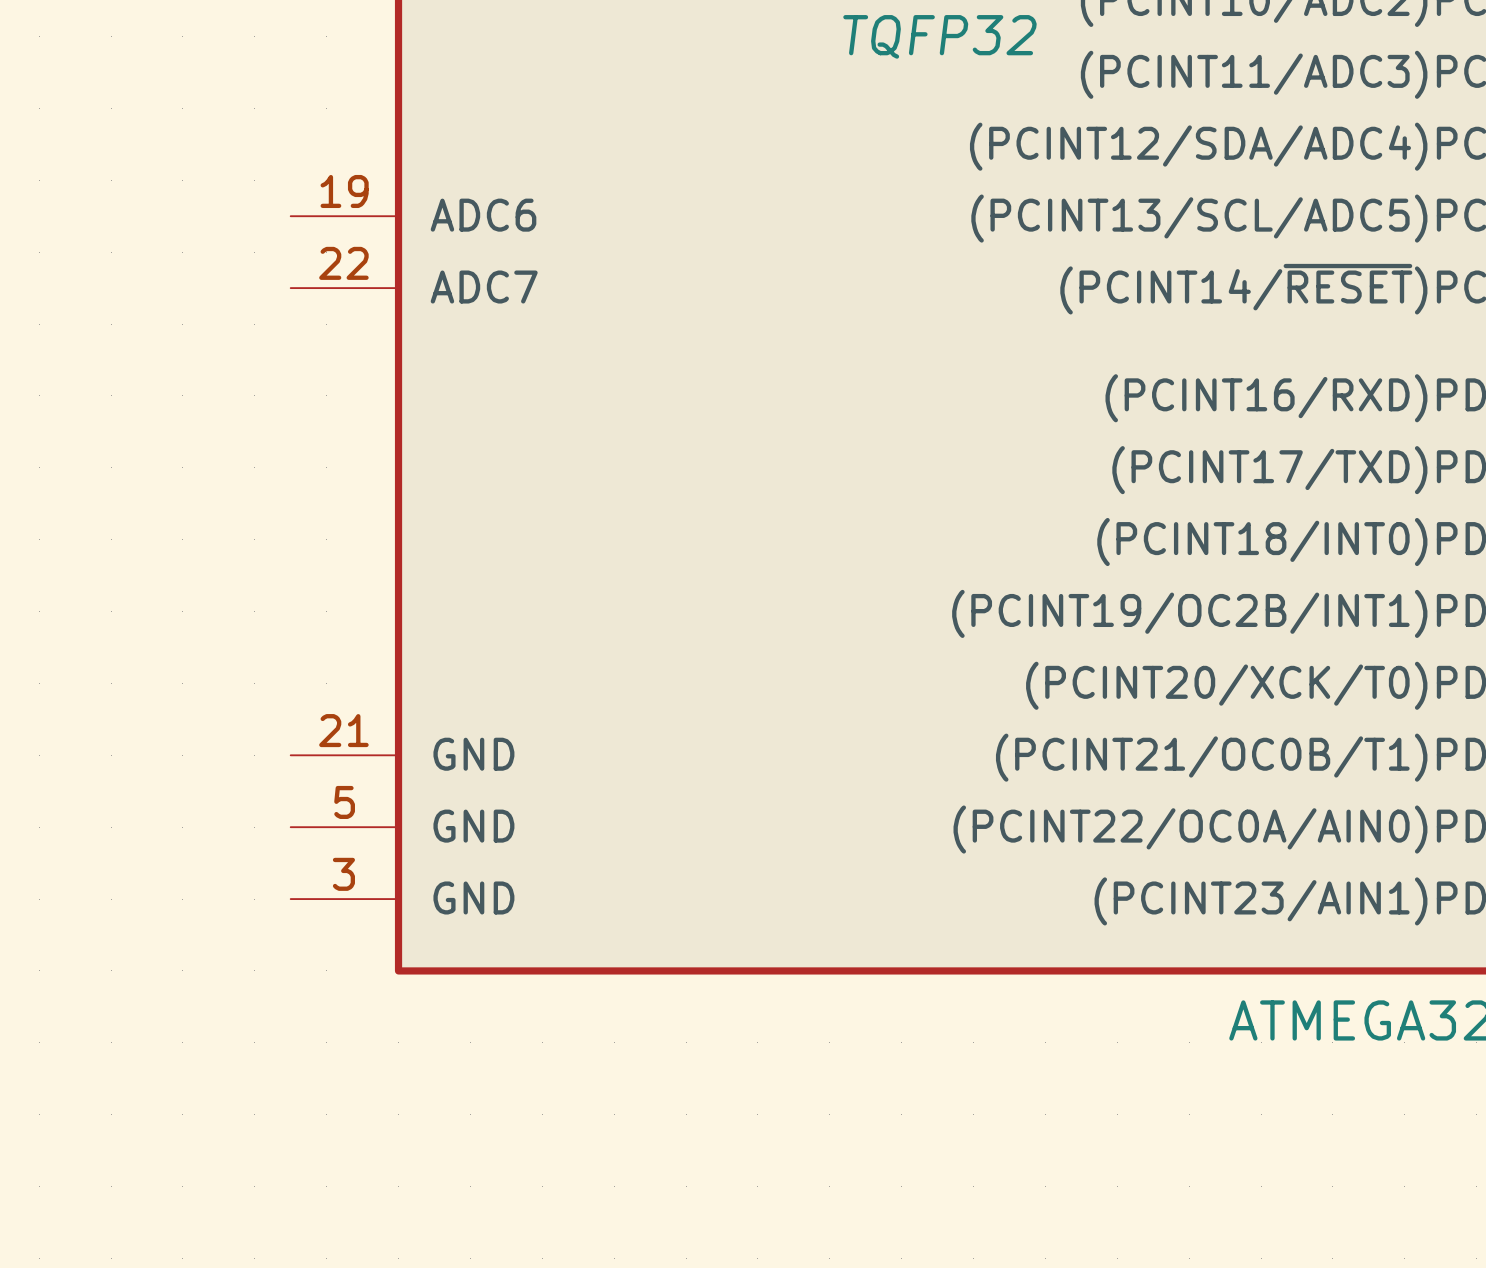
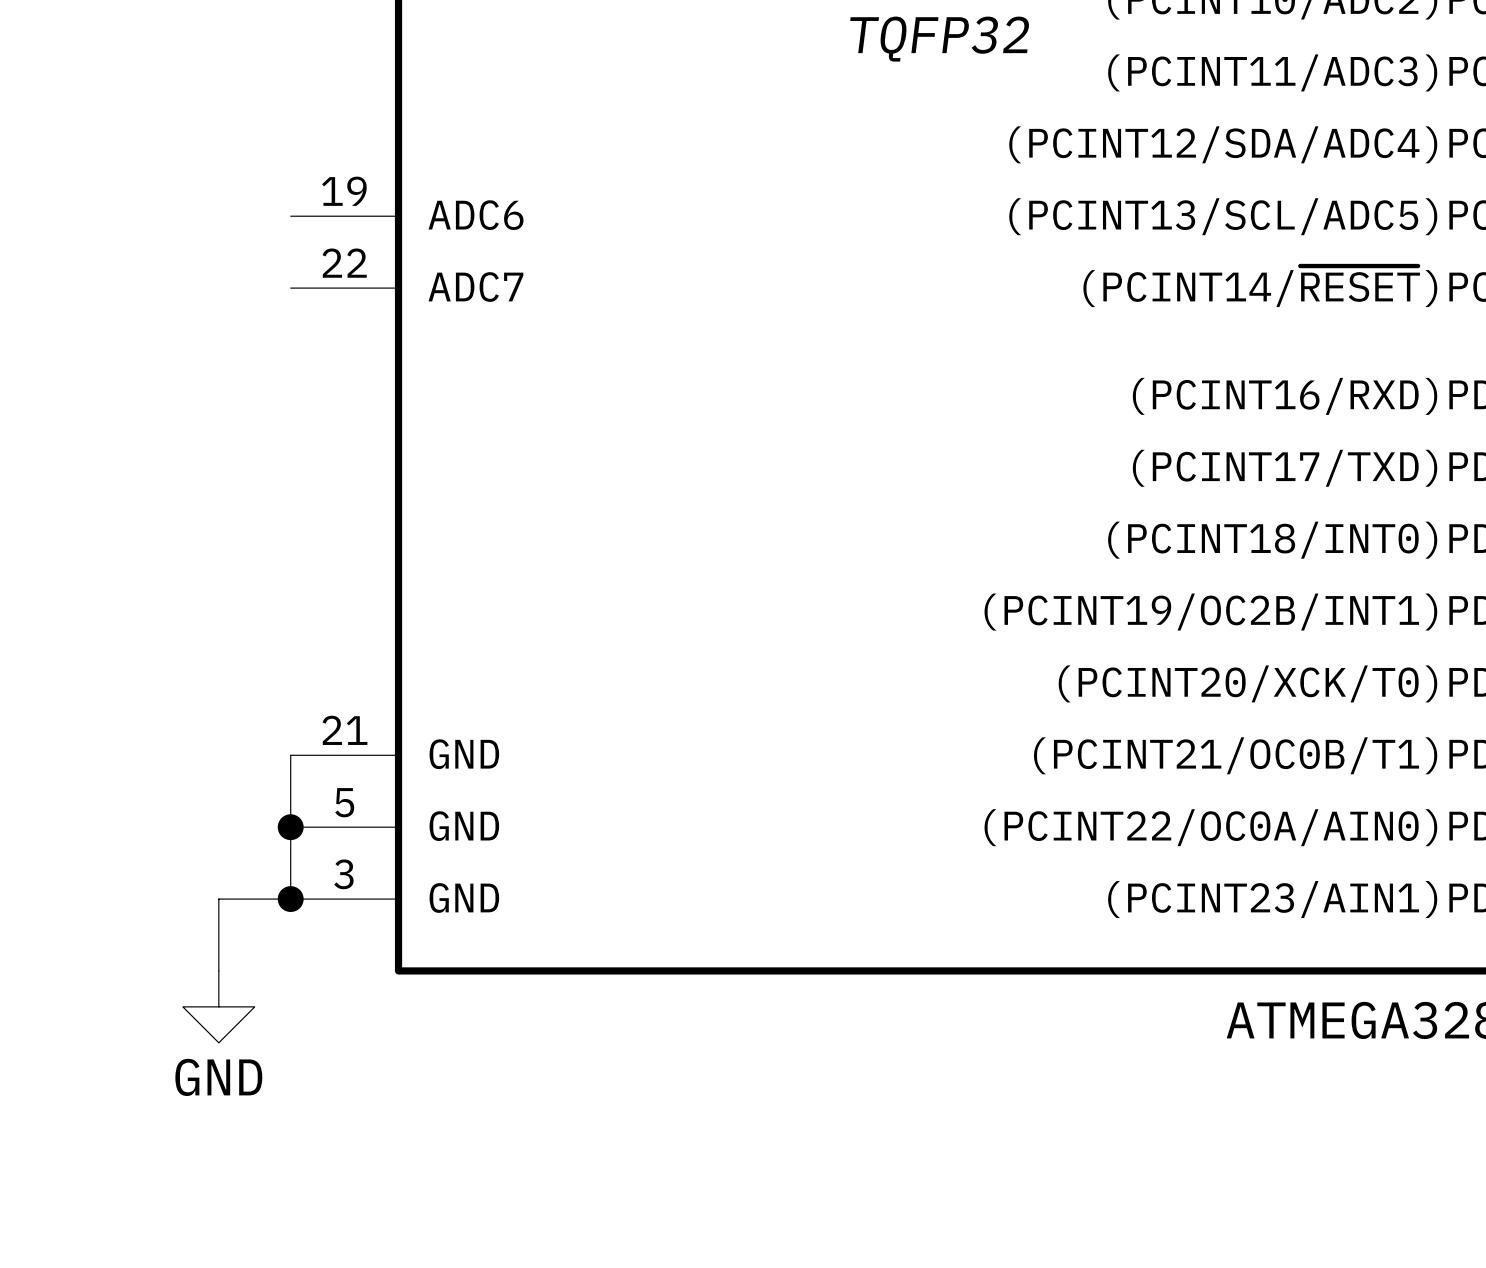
wire: none -> (290, 755) (290, 899) (218, 899) (218, 970)
junction: none -> (290, 827)
junction: none -> (290, 899)
power symbol: none -> GND (218, 1006)

